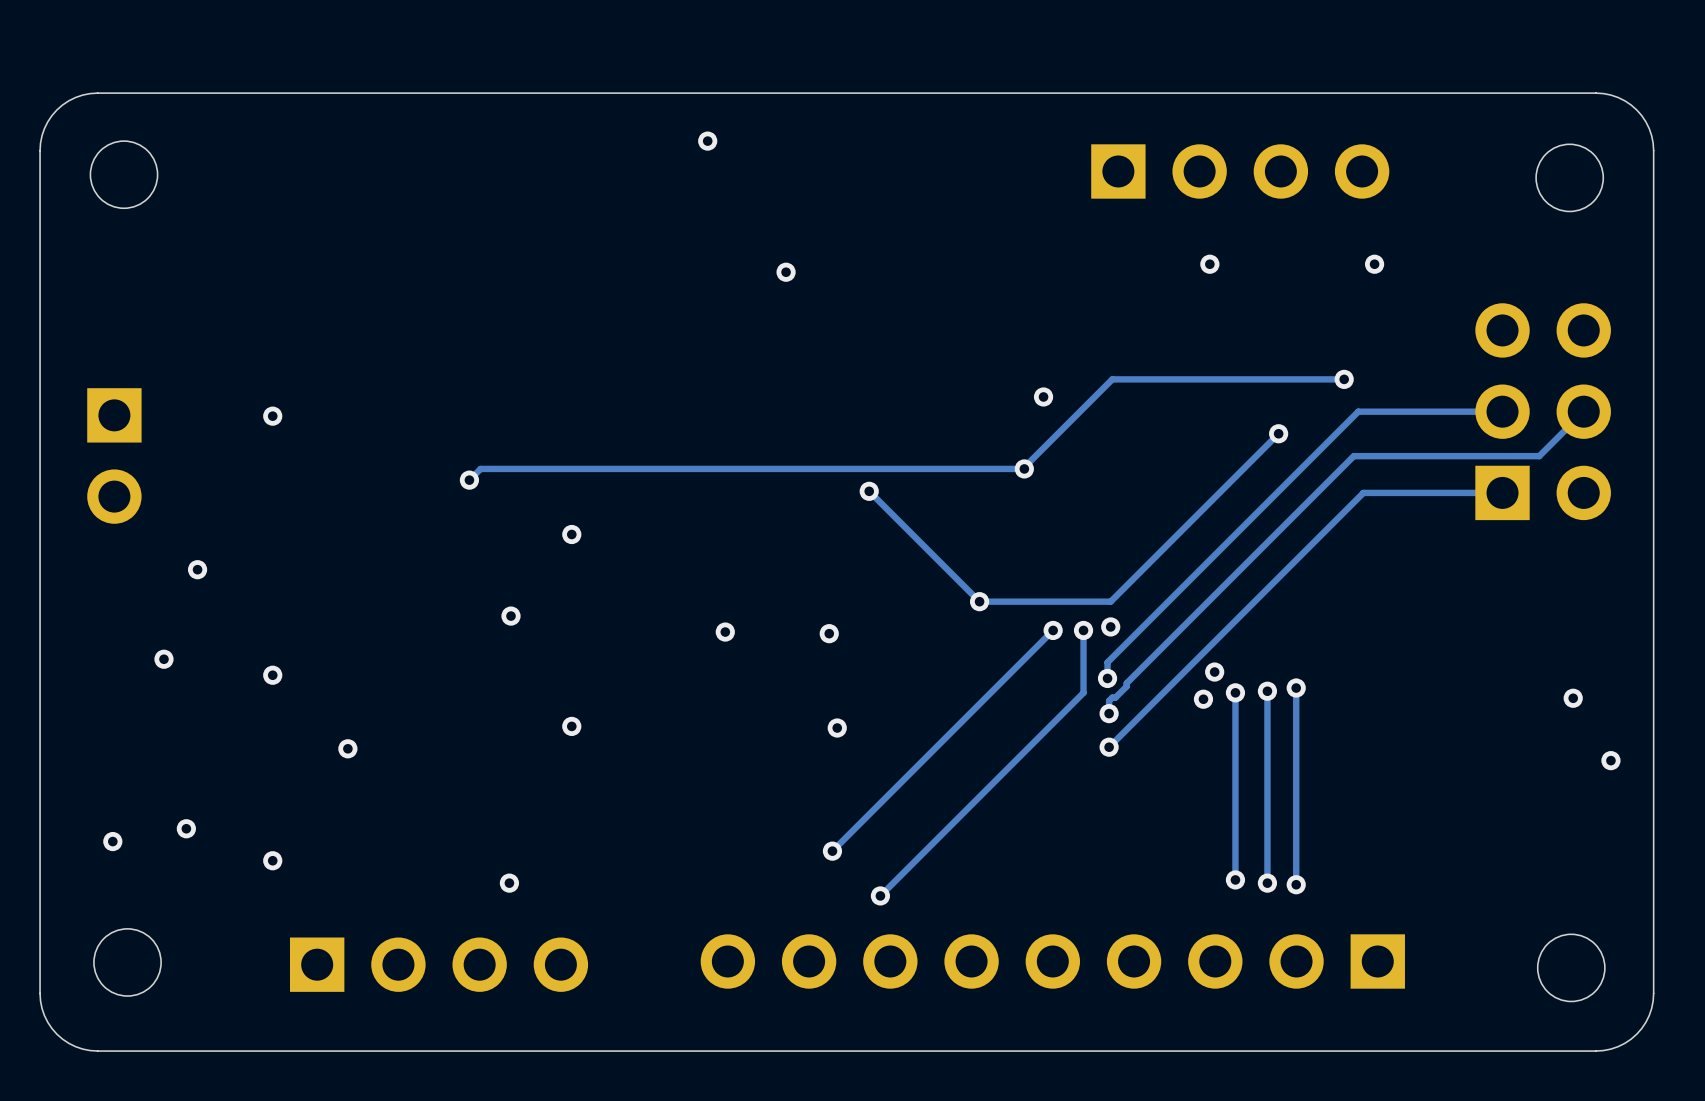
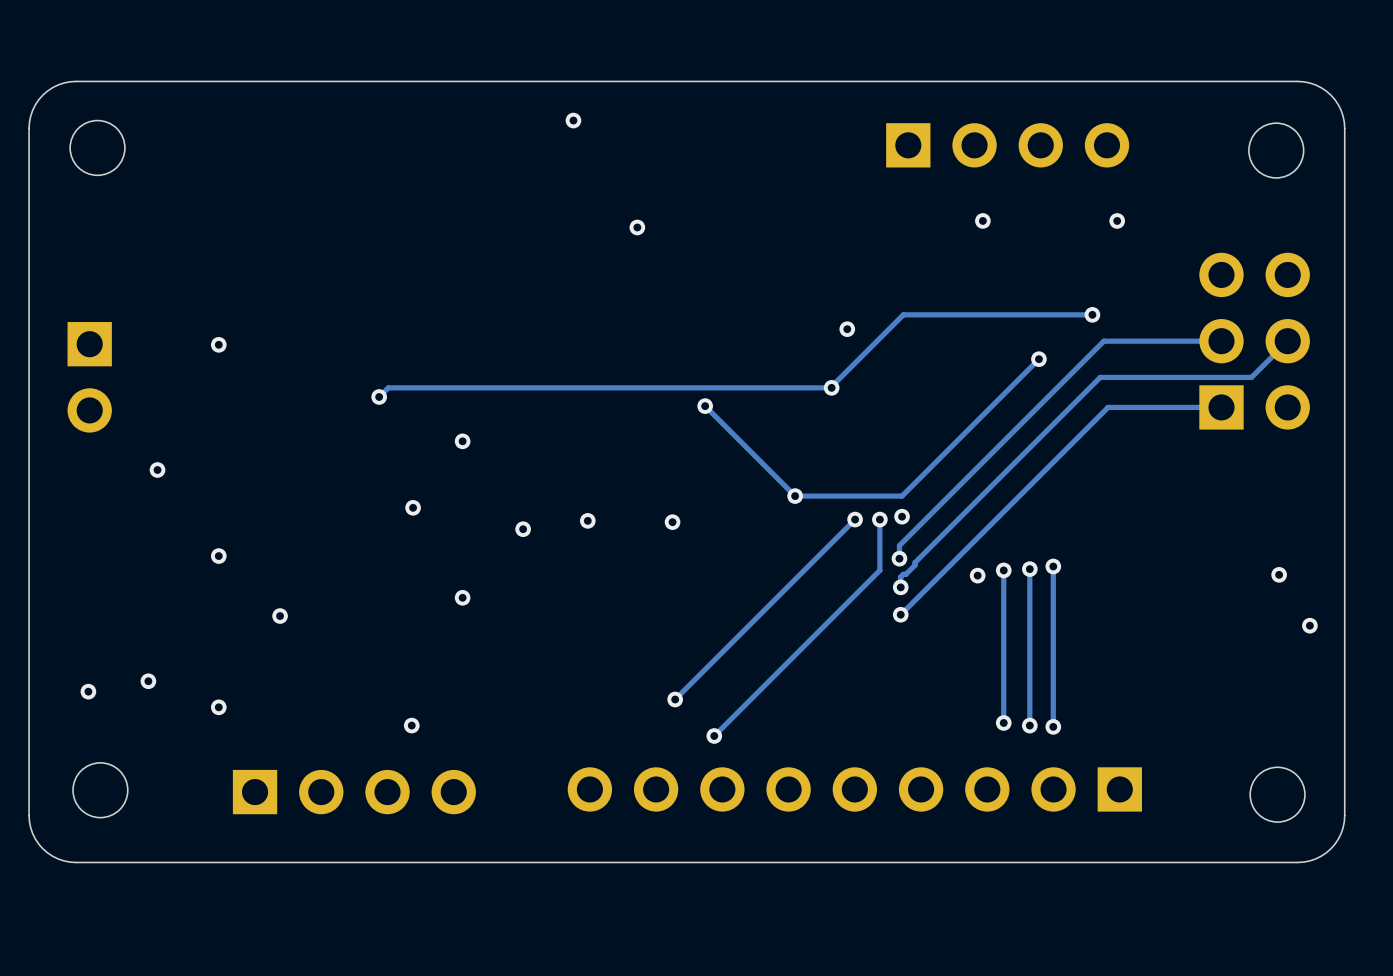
via: none -> (523, 529)
via: (163, 659) -> none
via: (1214, 672) -> none
via: (837, 728) -> none

